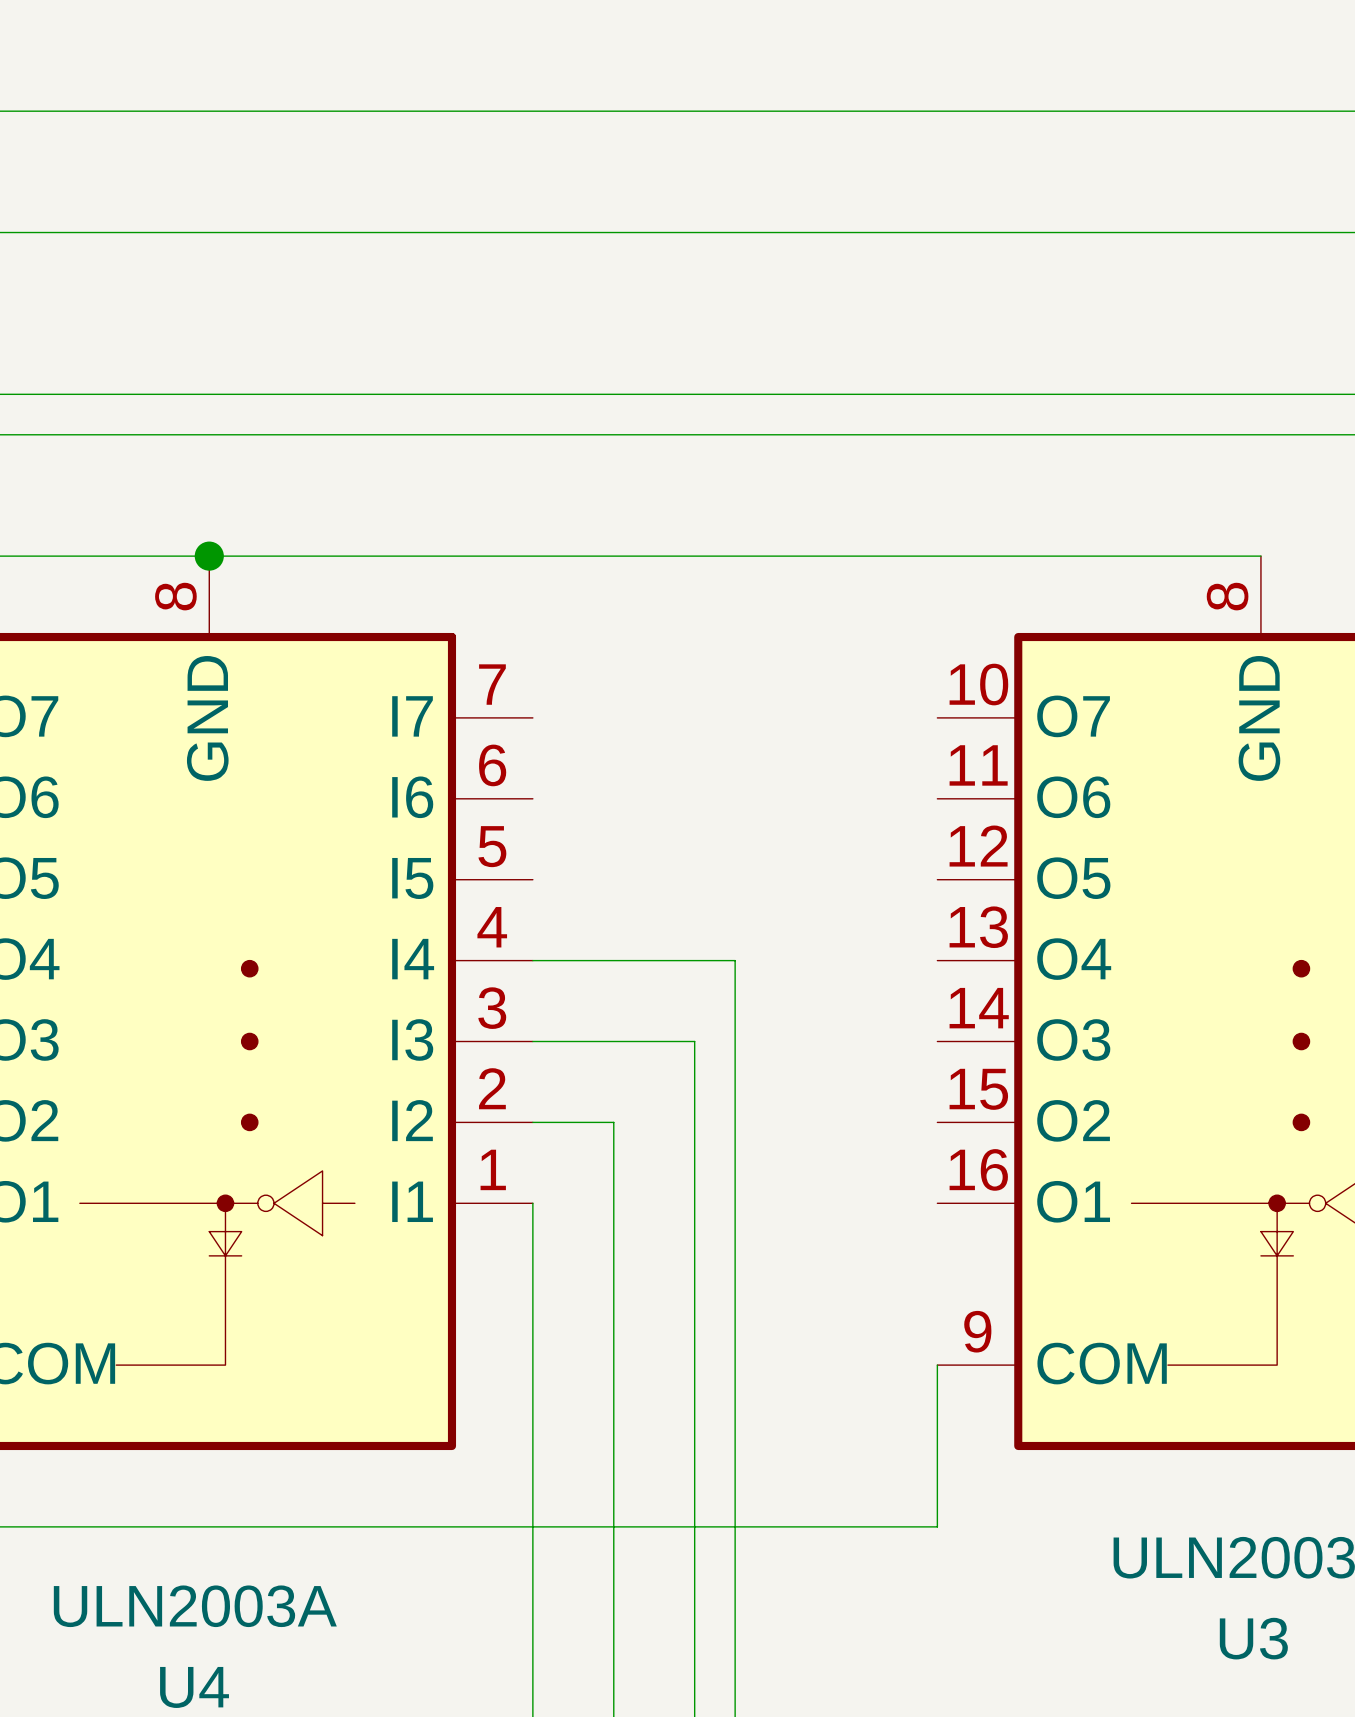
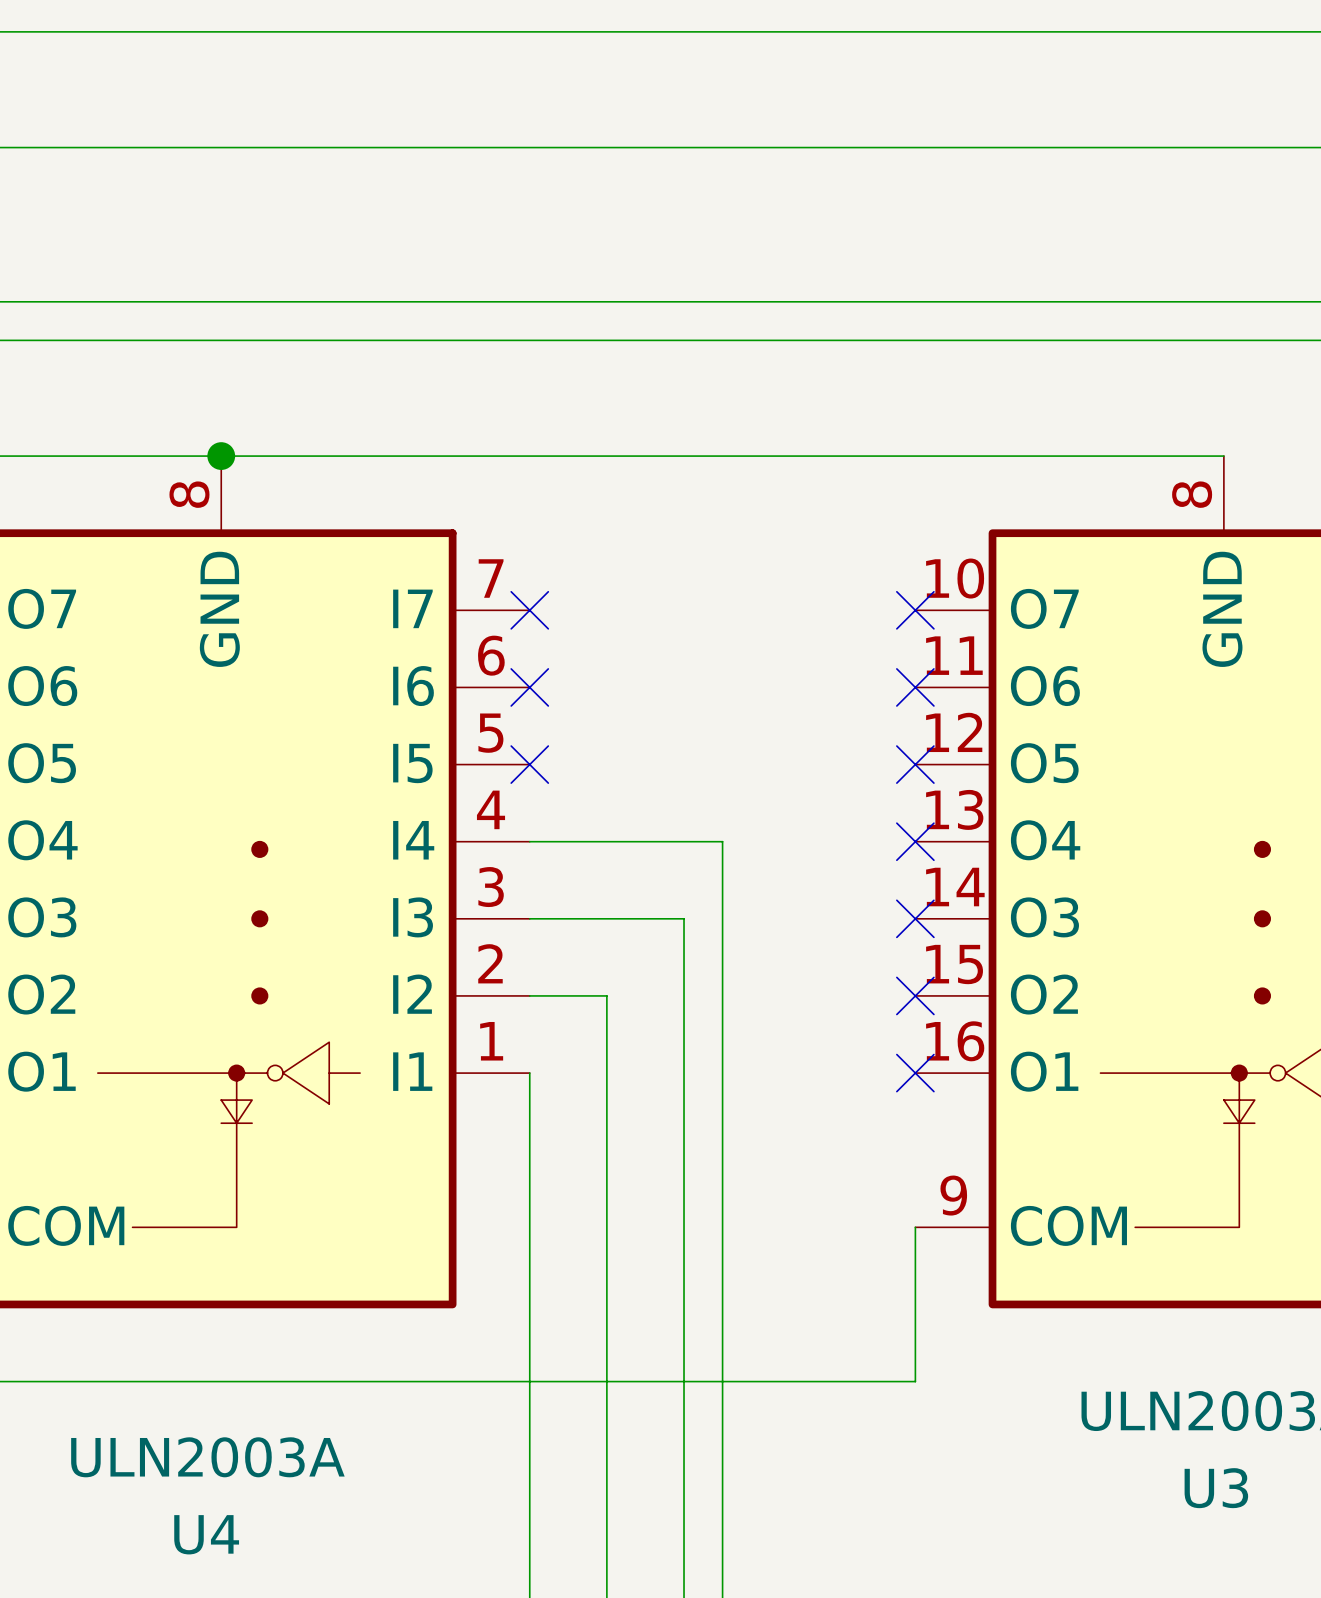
no-connect mark: none -> (529, 610)
no-connect mark: none -> (915, 610)
no-connect mark: none -> (529, 687)
no-connect mark: none -> (915, 687)
no-connect mark: none -> (529, 764)
no-connect mark: none -> (915, 764)
no-connect mark: none -> (915, 841)
no-connect mark: none -> (915, 918)
no-connect mark: none -> (915, 995)
no-connect mark: none -> (915, 1073)

